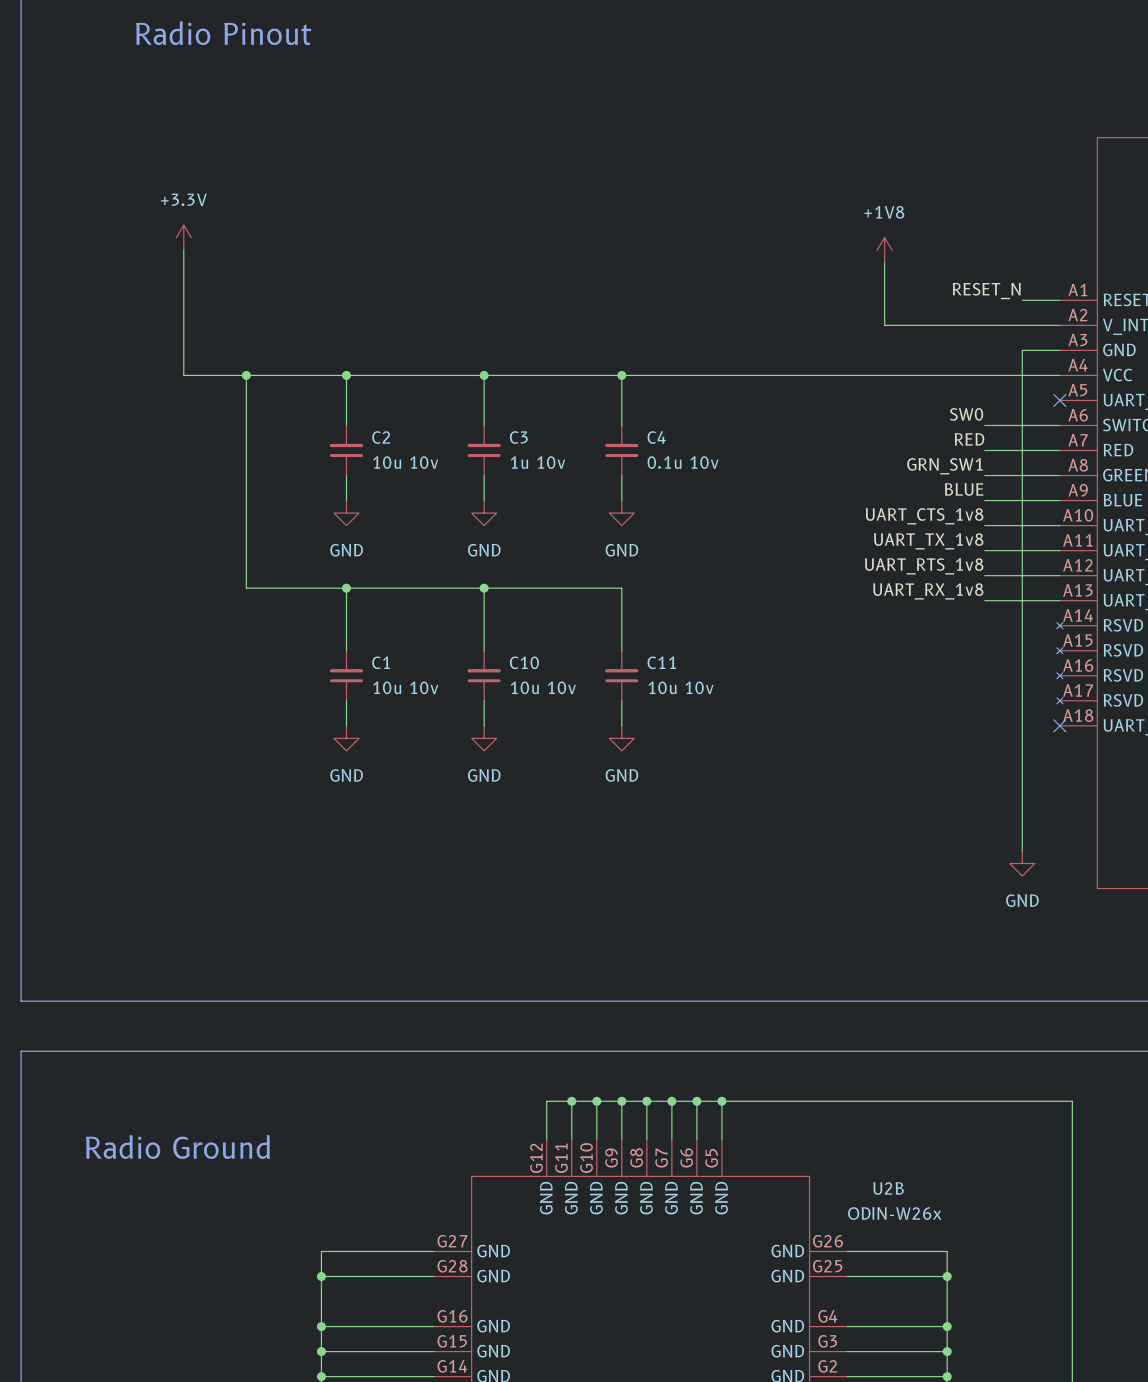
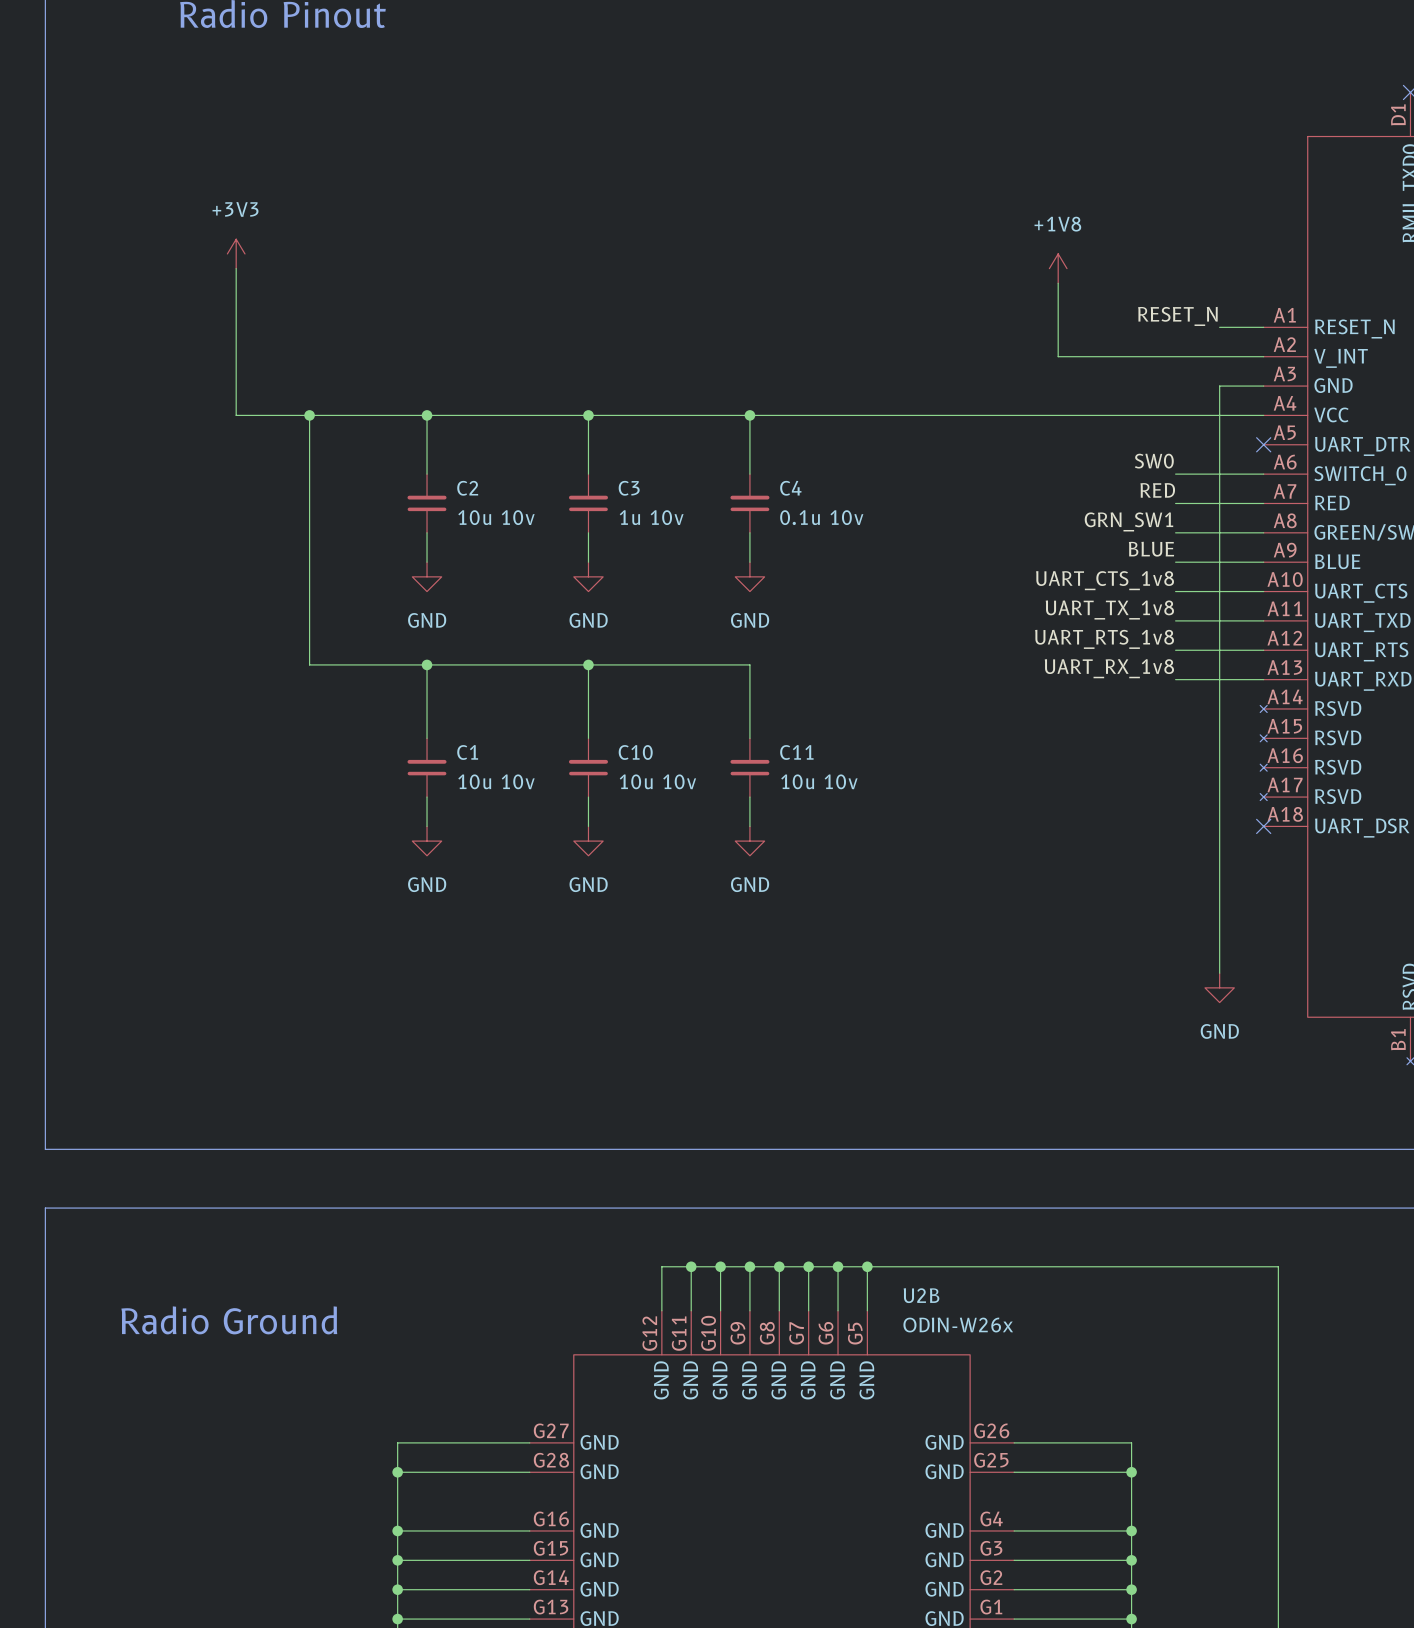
power symbol: +3.3V (183, 237) -> +3V3 (236, 253)
U2B name position: U2B (888, 1188) -> U2B (921, 1295)
U2B value position: ODIN-W26x (894, 1213) -> ODIN-W26x (958, 1325)

